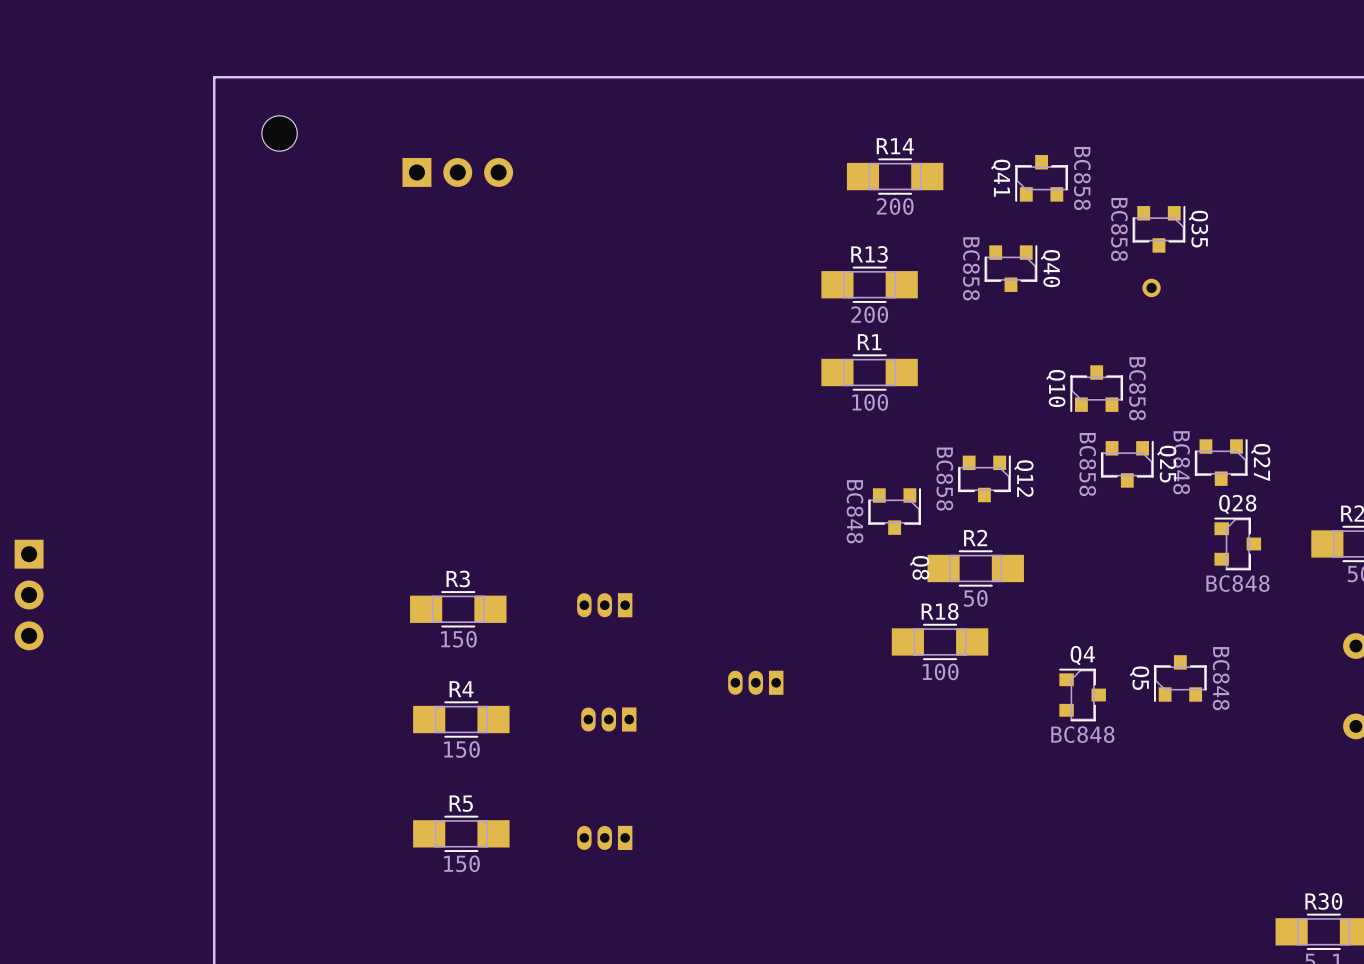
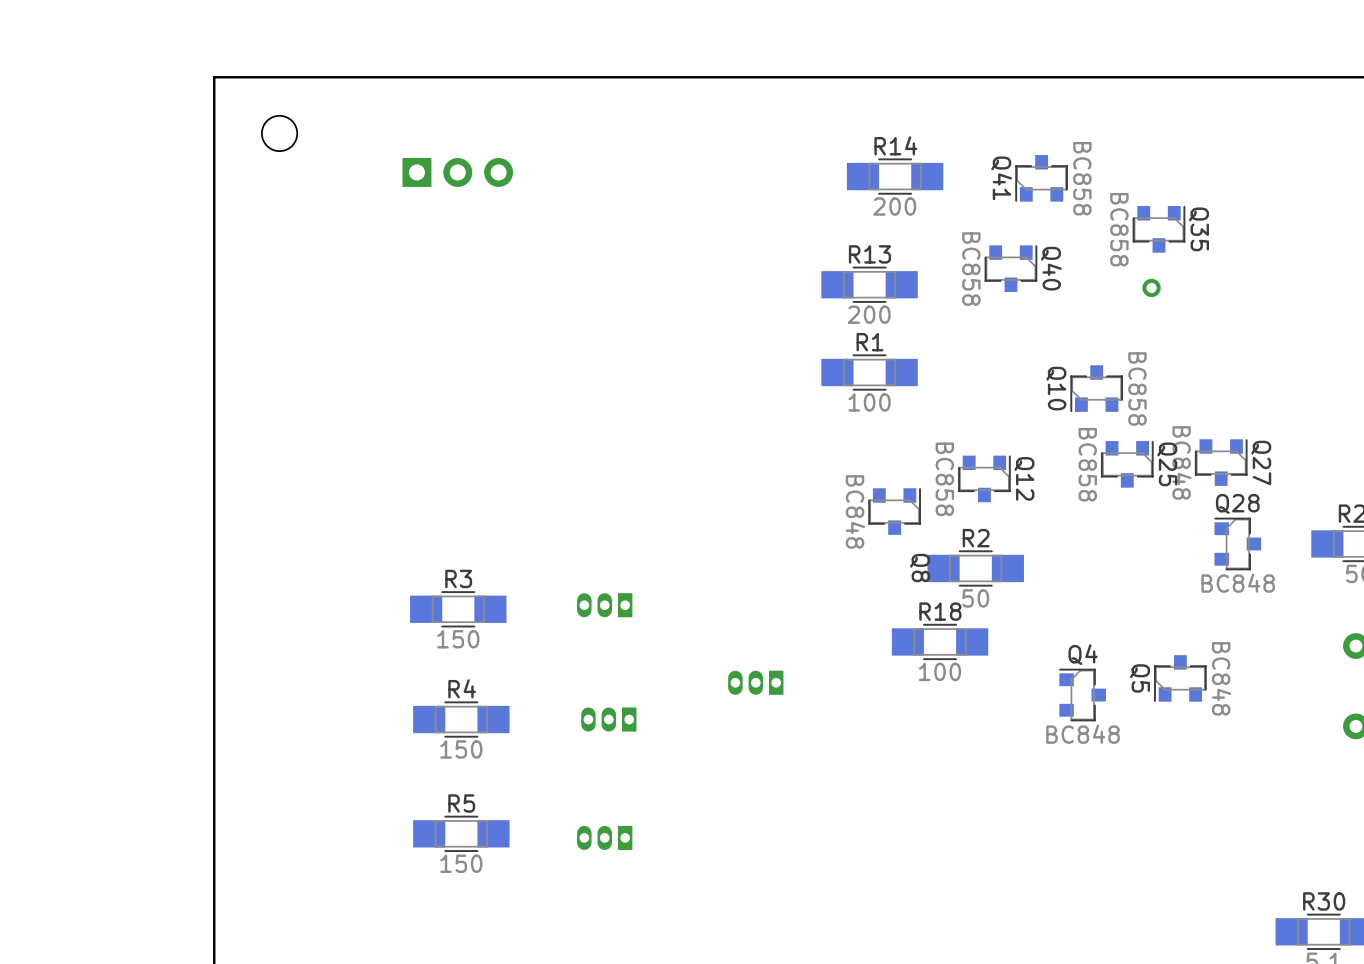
part: (29, 595) -> none

